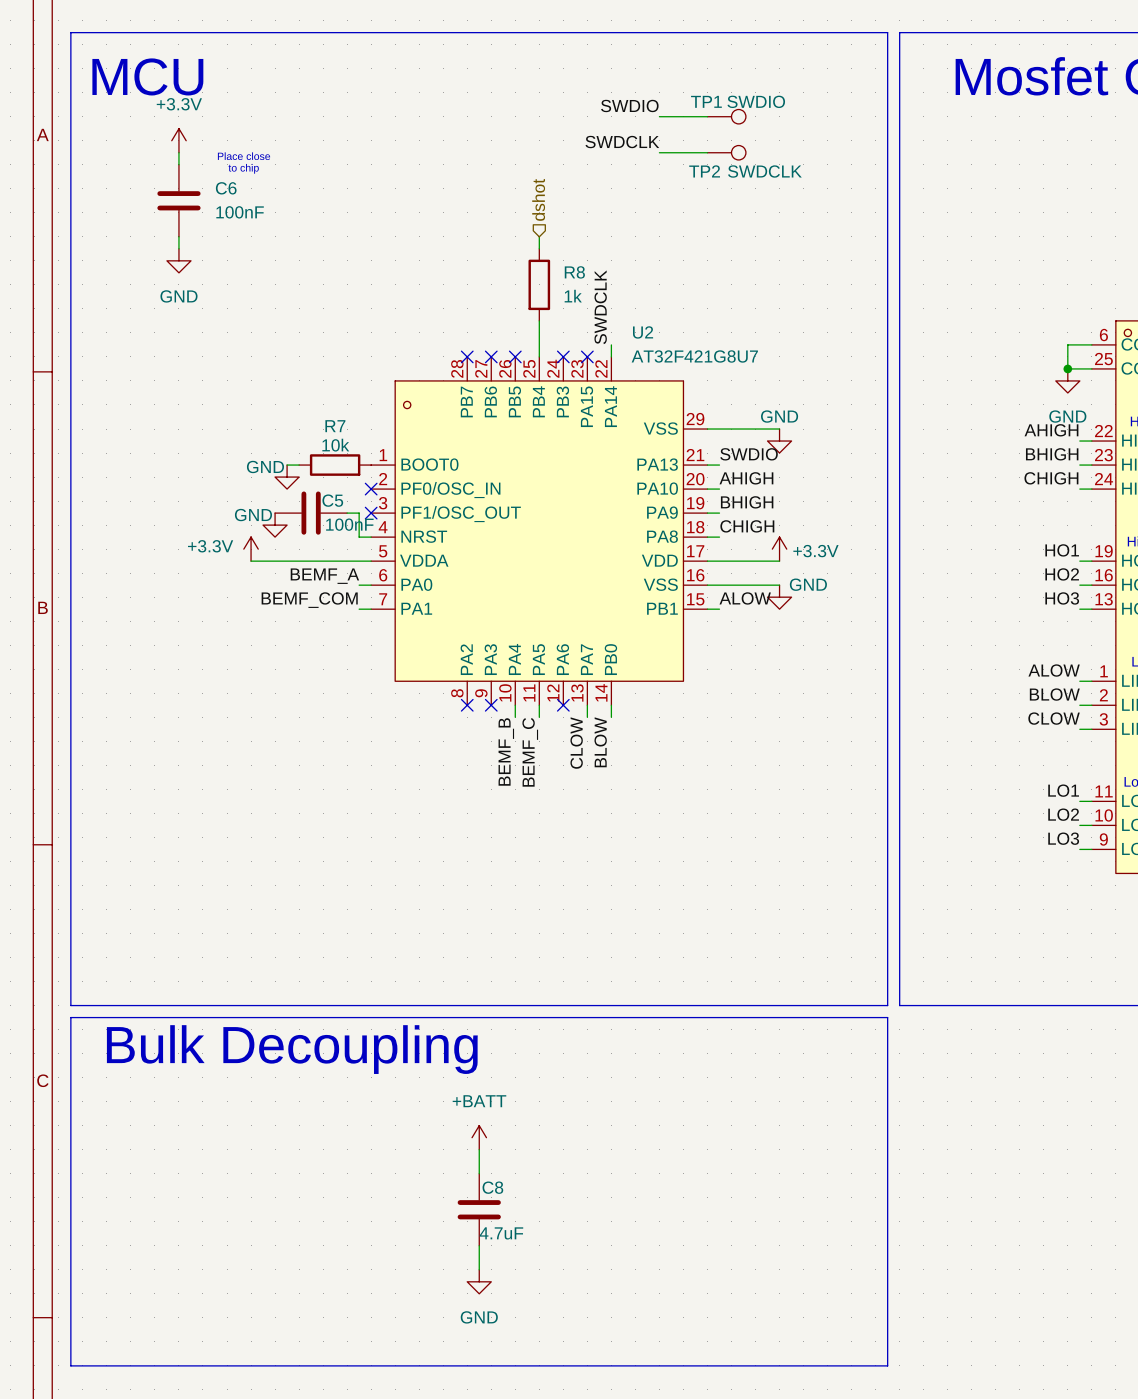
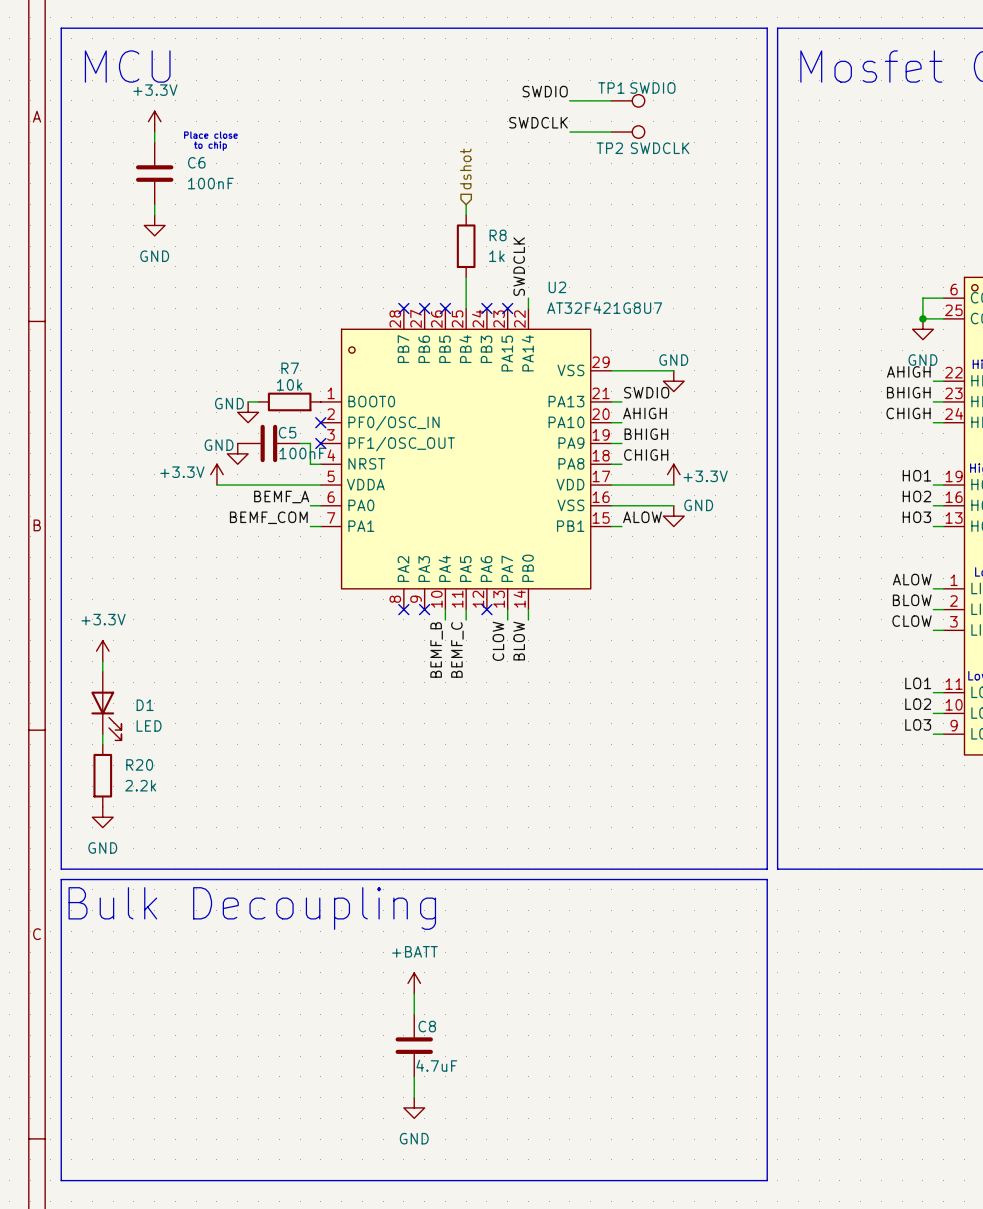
power symbol: none -> +3.3V (102, 651)
wire: none -> (102, 661) (102, 671)
D1: none -> LED (106, 706)
wire: none -> (102, 734) (102, 744)
R20: none -> 2.2k (102, 775)
power symbol: none -> GND (102, 817)

